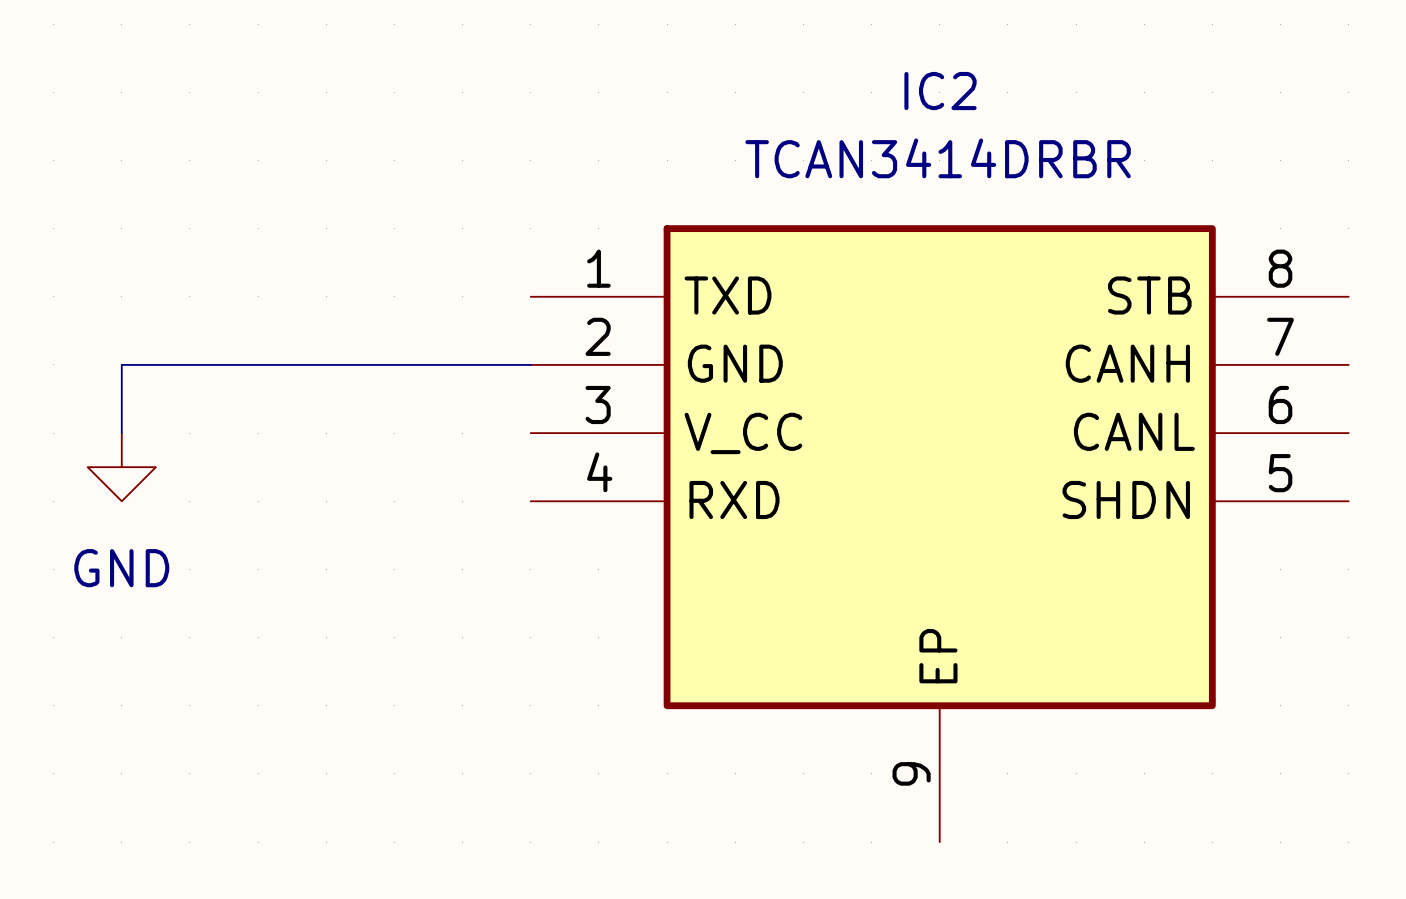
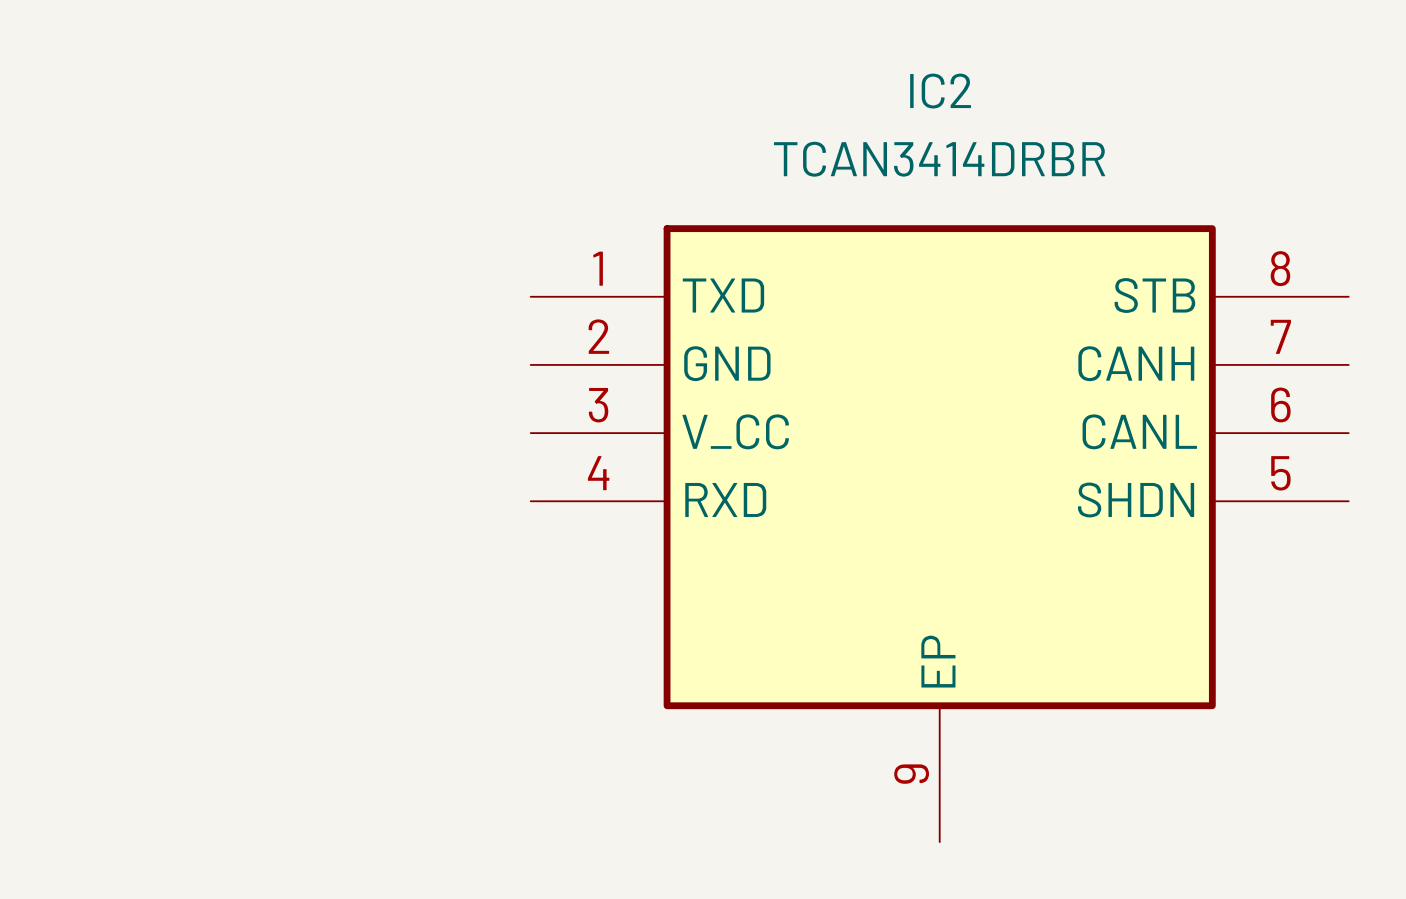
wire: (530, 364) (121, 364) (121, 433) -> none
power symbol: GND (121, 467) -> none

